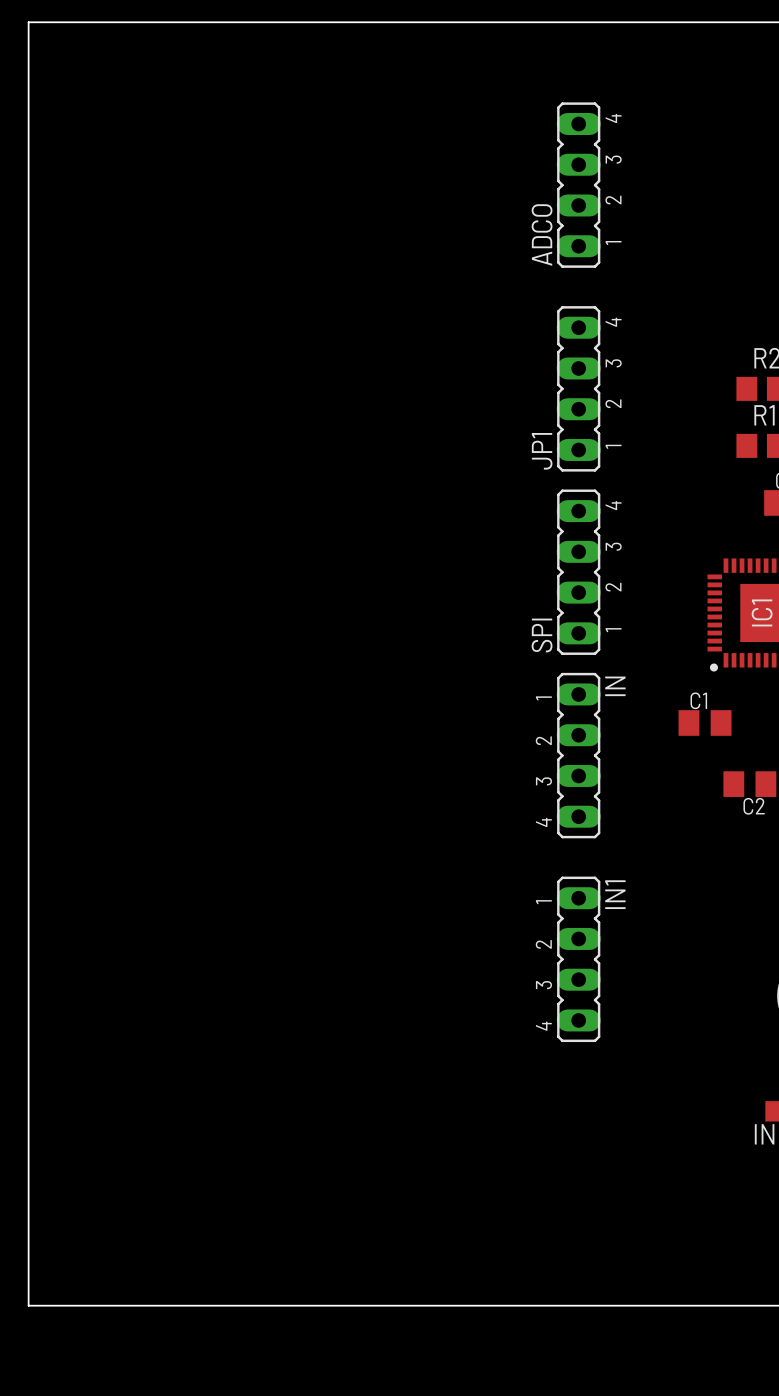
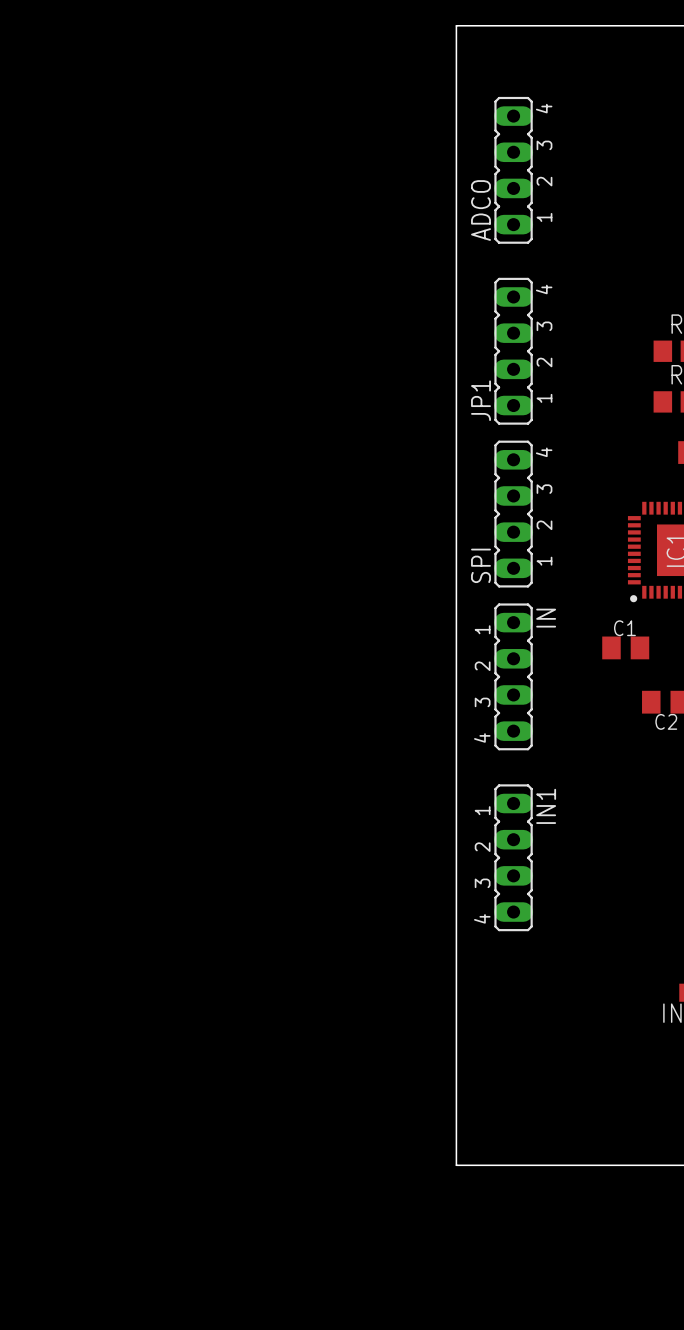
board edge: (514, 22) (28, 22) (28, 1305) (514, 1305) -> (456, 25) (456, 1165)

